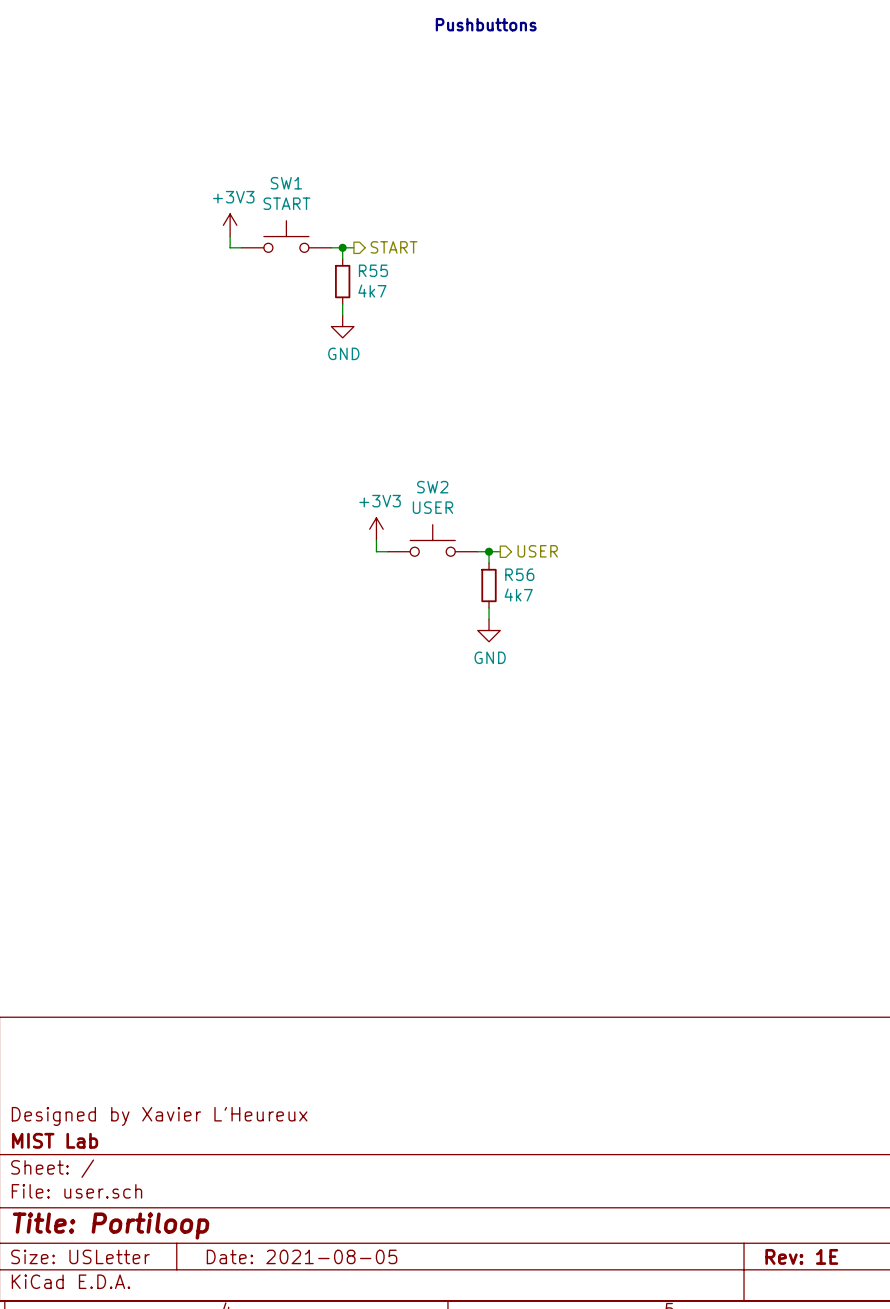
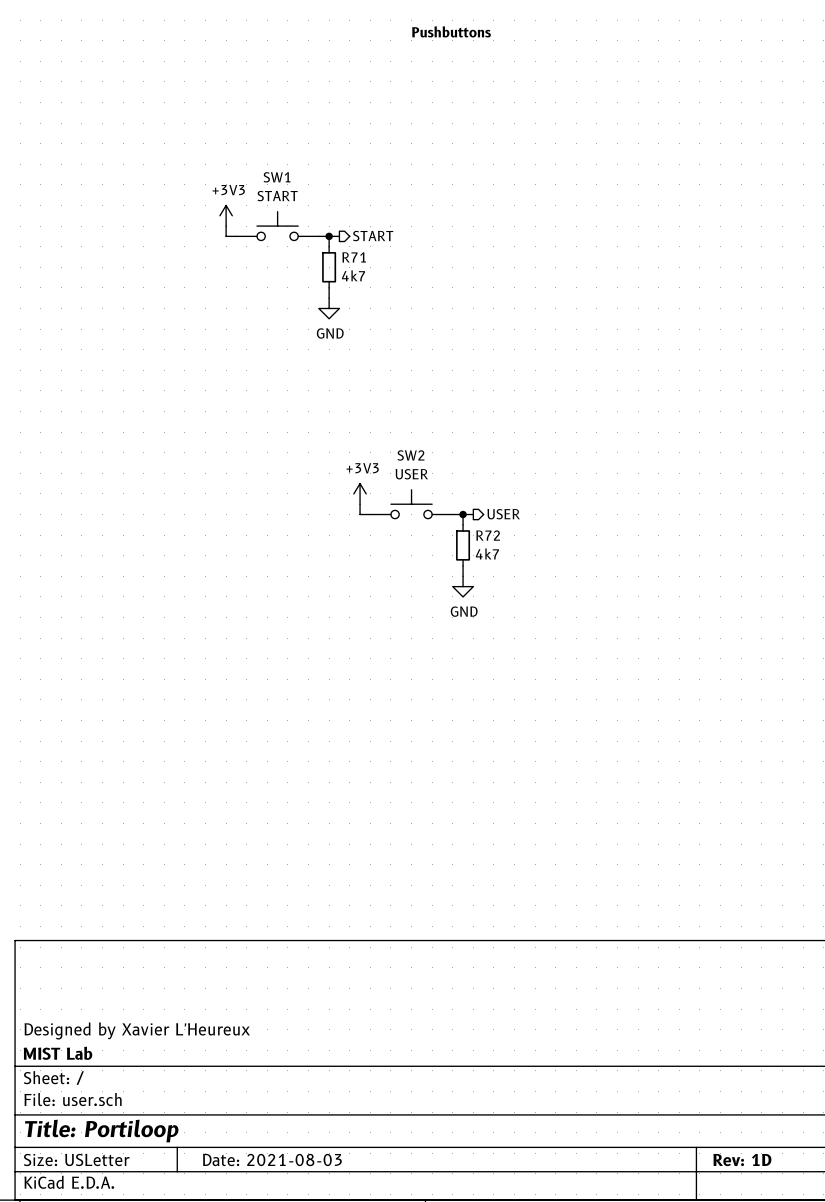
R55 name: R55 (373, 270) -> R71 (354, 257)
R56 name: R56 (519, 574) -> R72 (488, 535)
title block: Date: 2021-08-05 (302, 1256) -> Date: 2021-08-03 (272, 1159)
title block: Rev: 1E (801, 1256) -> Rev: 1D (742, 1160)

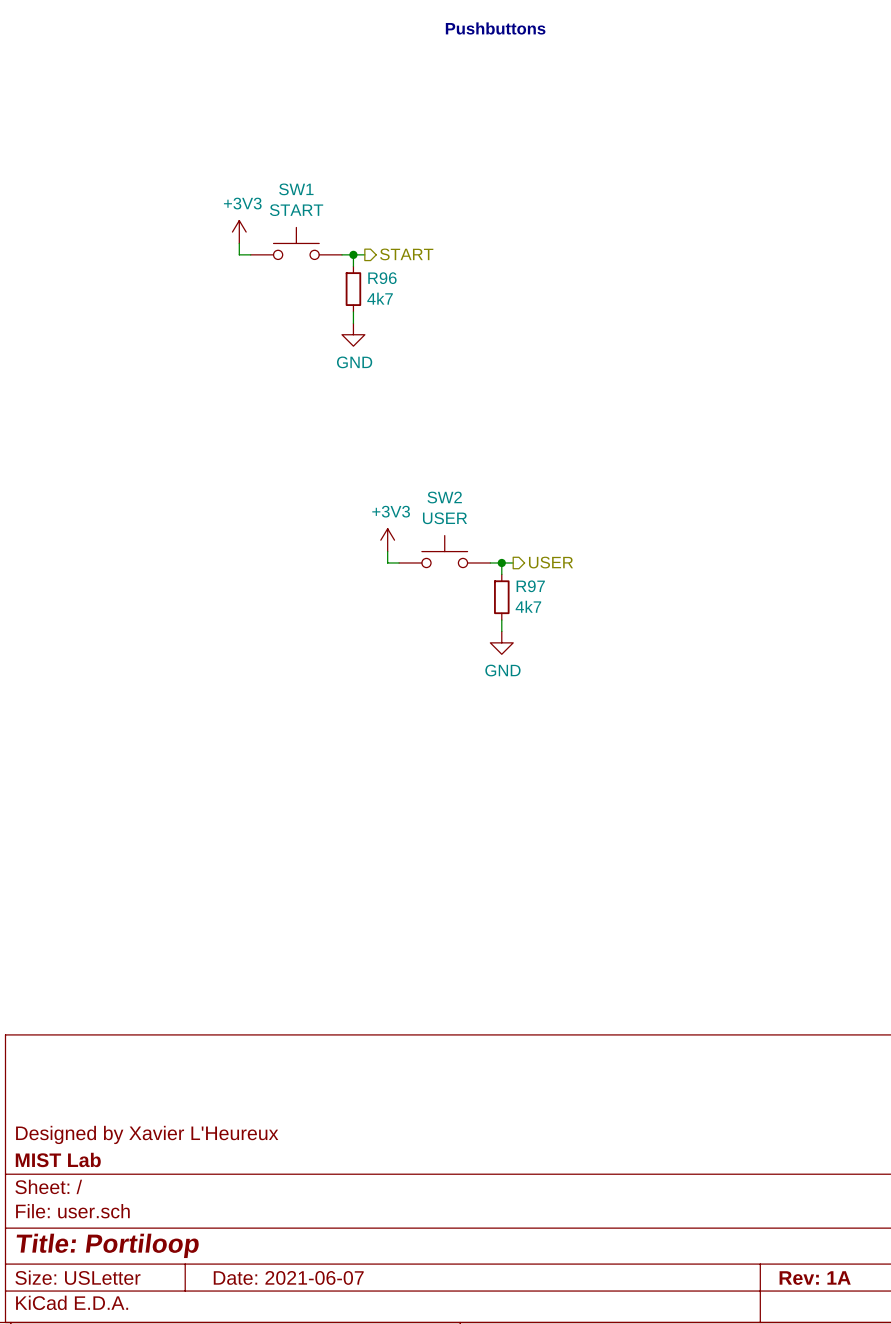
R71 name: R71 (354, 257) -> R96 (382, 278)
R72 name: R72 (488, 535) -> R97 (530, 586)
title block: Date: 2021-08-03 (272, 1159) -> Date: 2021-06-07 (288, 1277)
title block: Rev: 1D (742, 1160) -> Rev: 1A (815, 1278)

